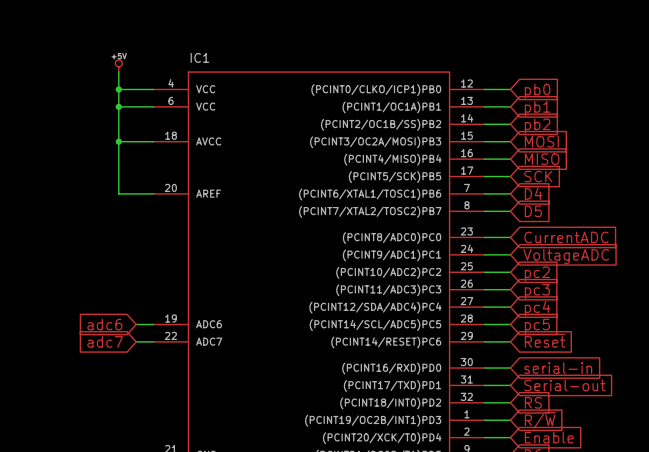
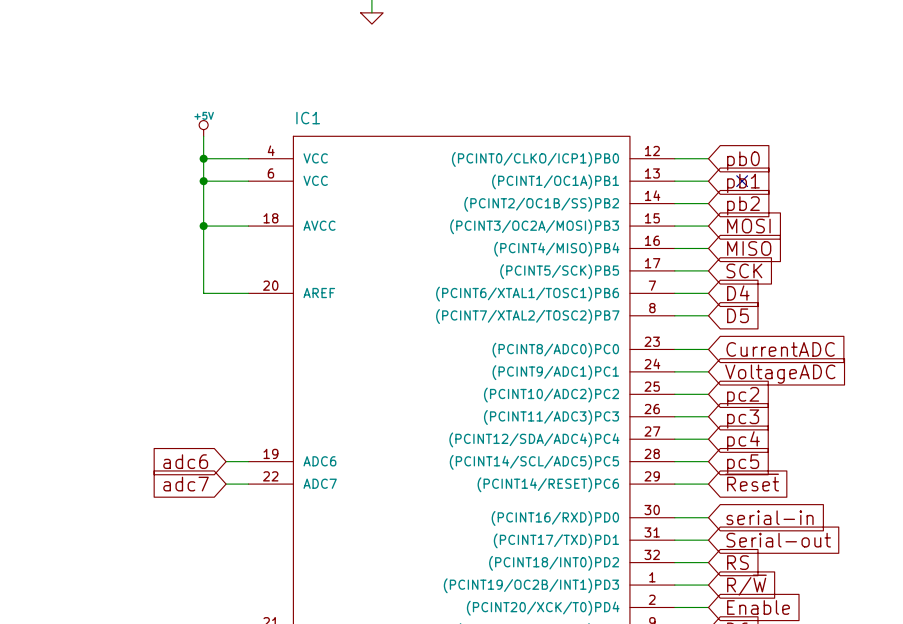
no-connect mark: none -> (742, 181)

